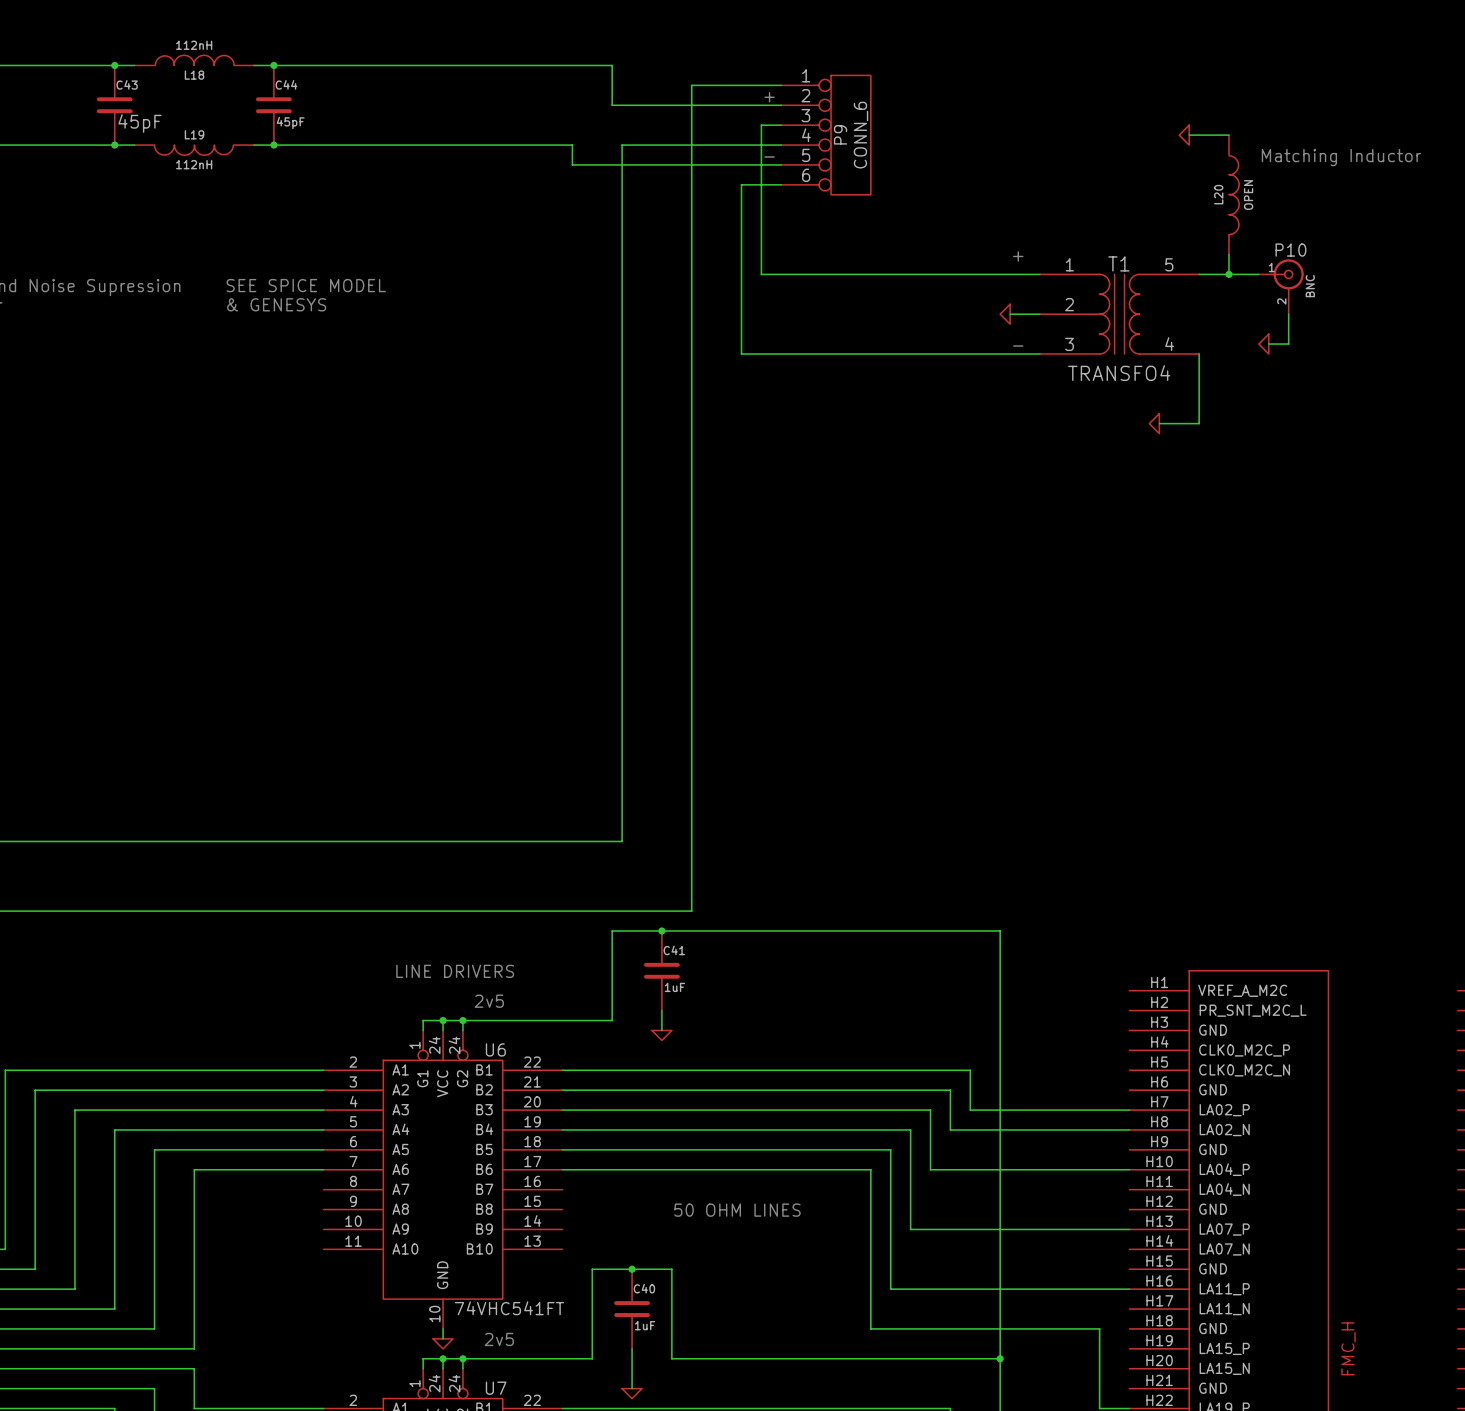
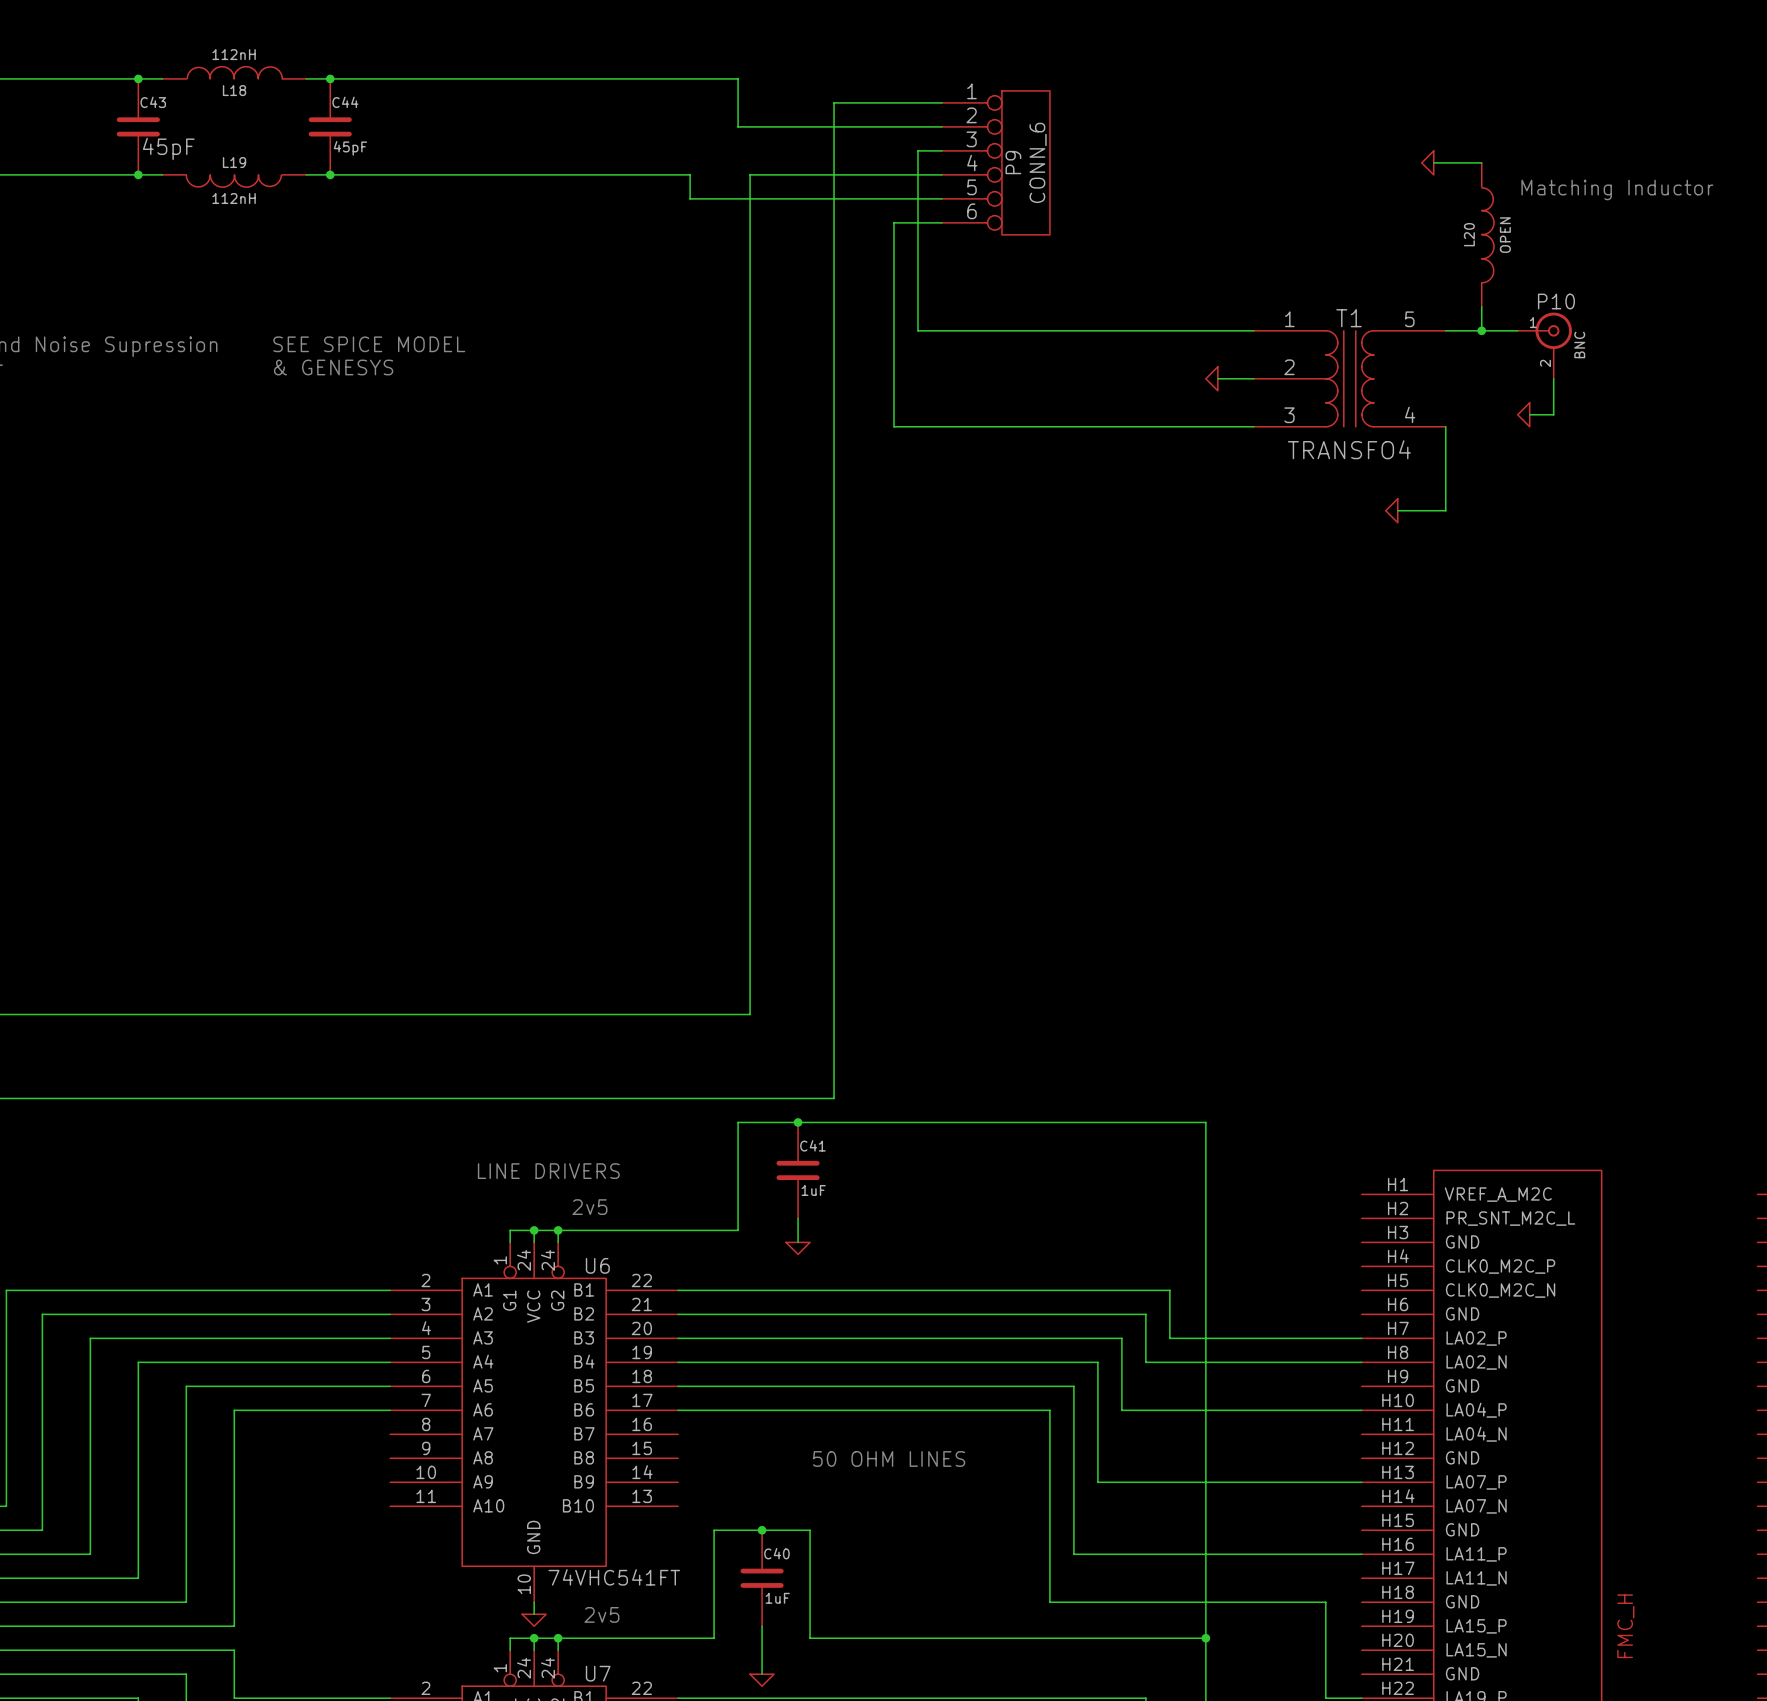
text: + (769, 97) -> none
text: - (769, 156) -> none
text: + (1018, 256) -> none
text: - (1018, 346) -> none

